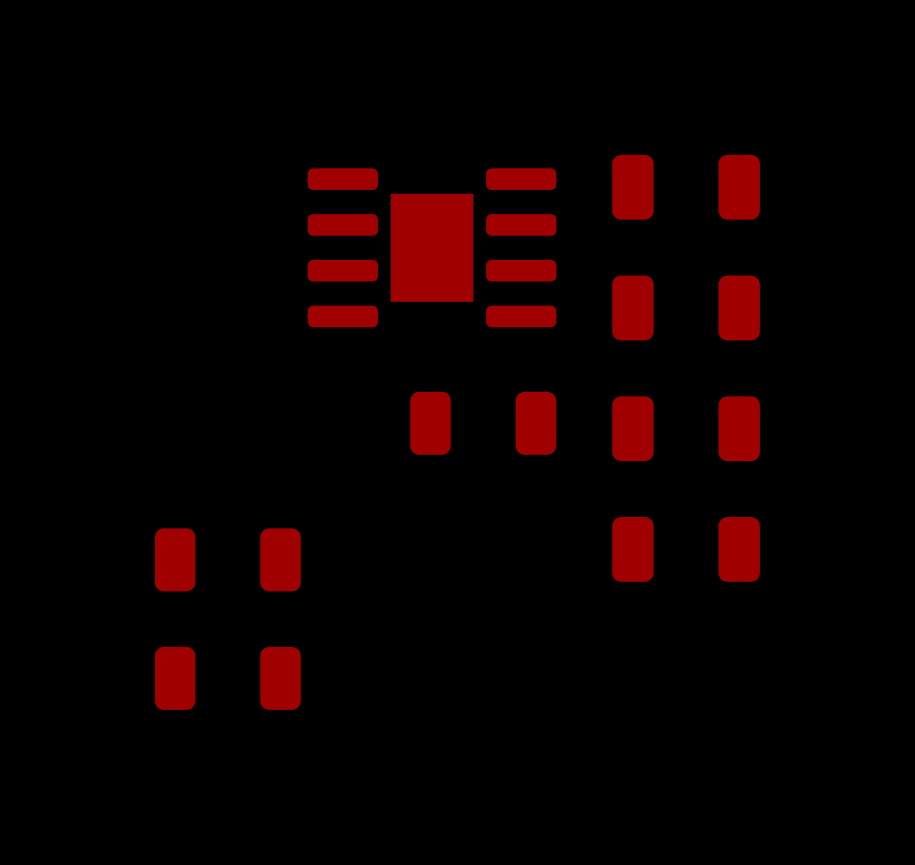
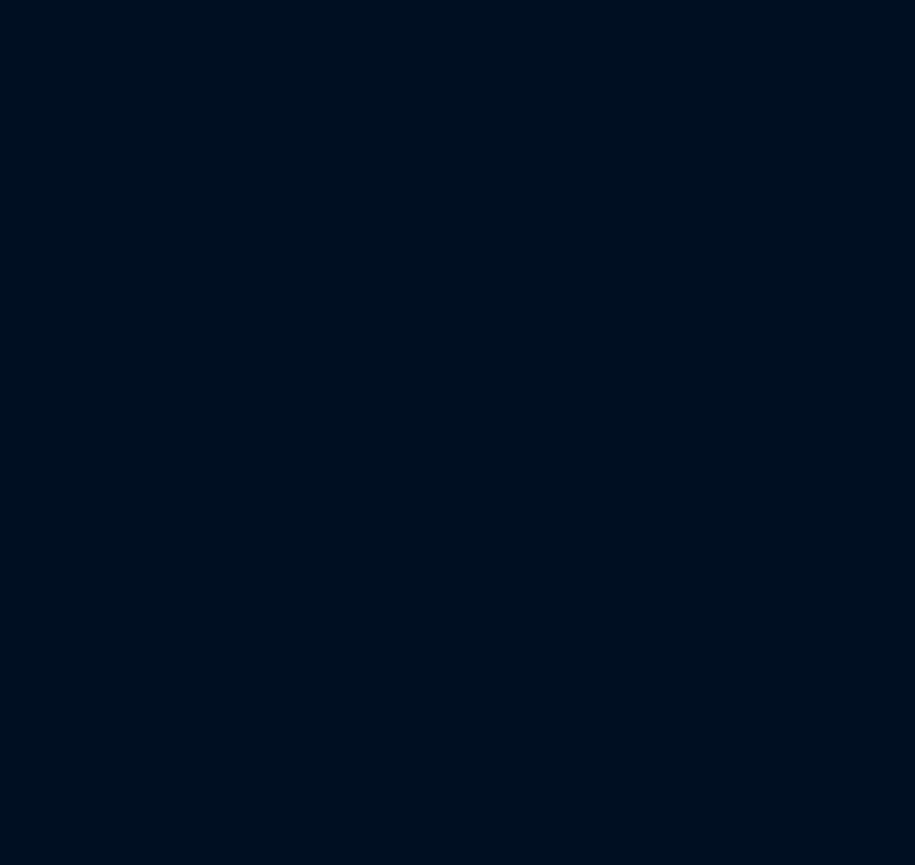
part: (686, 187) -> none
part: (432, 247) -> none
part: (686, 307) -> none
part: (483, 423) -> none
part: (686, 428) -> none
part: (686, 549) -> none
part: (227, 559) -> none
part: (227, 678) -> none

